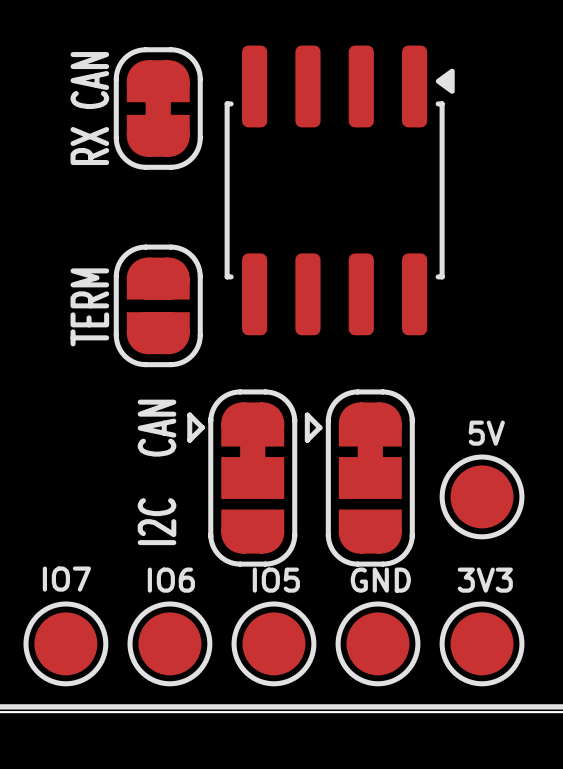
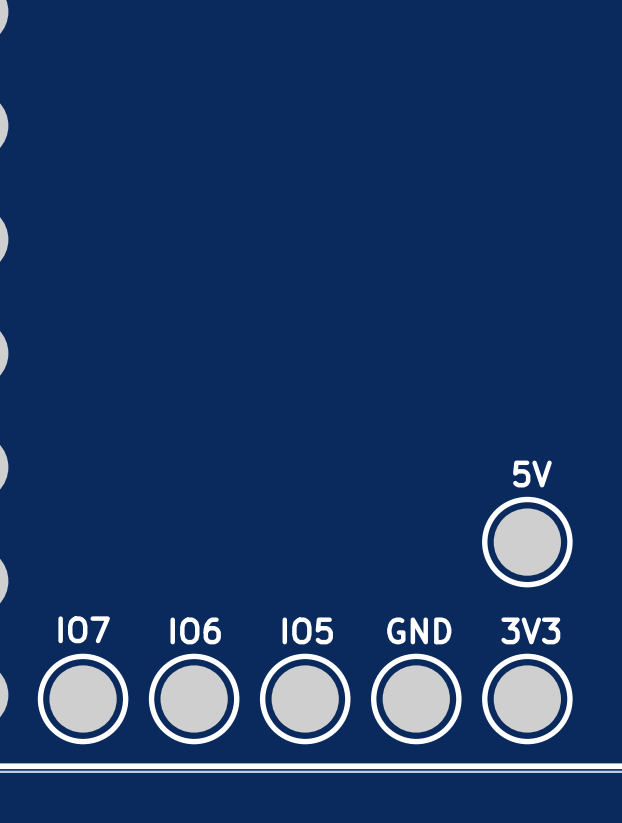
text: RX CAN (89, 108) -> none
part: (158, 108) -> none
part: (339, 190) -> none
part: (158, 305) -> none
text: TERM (89, 307) -> none
text: CAN (157, 428) -> none
part: (242, 478) -> none
part: (359, 478) -> none
text: I2C (157, 521) -> none

